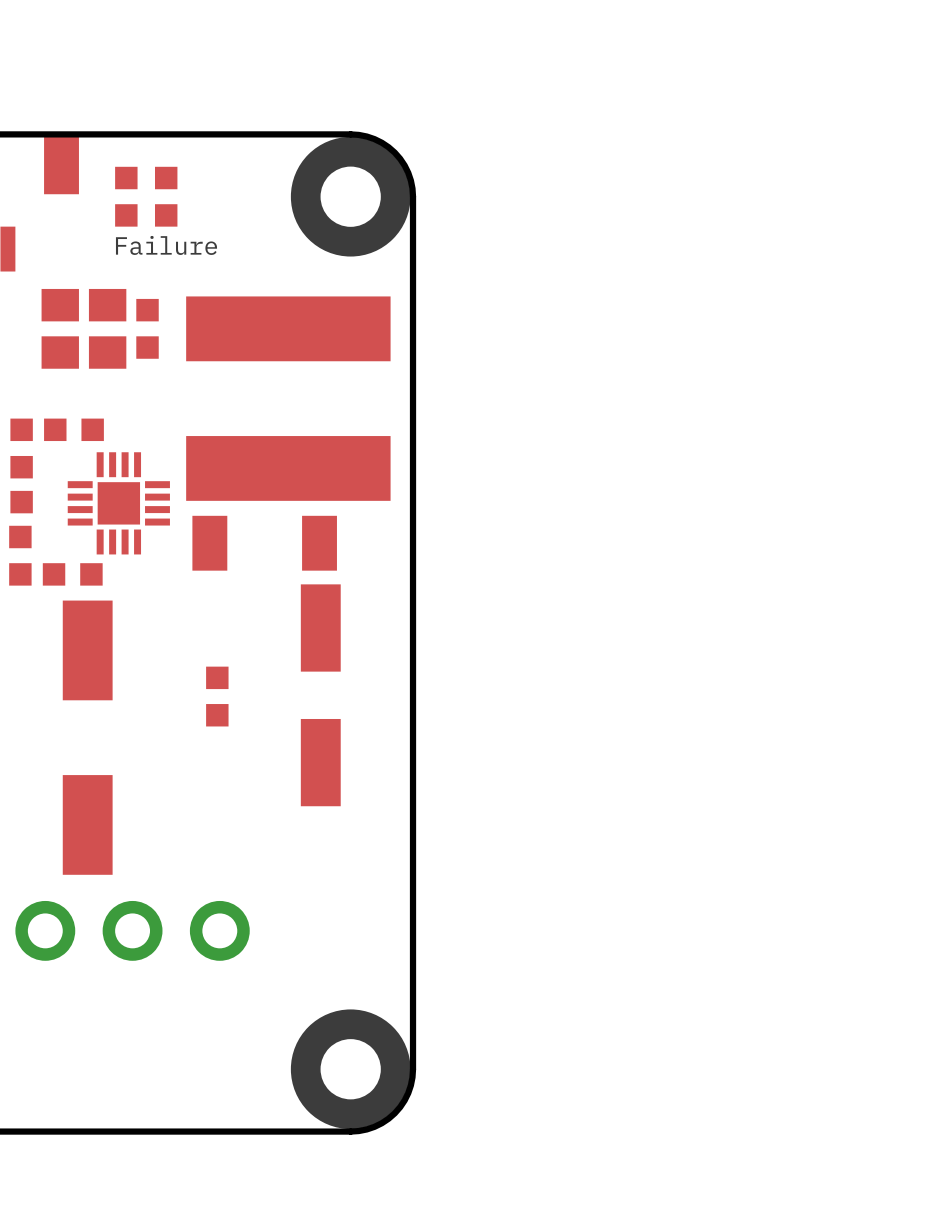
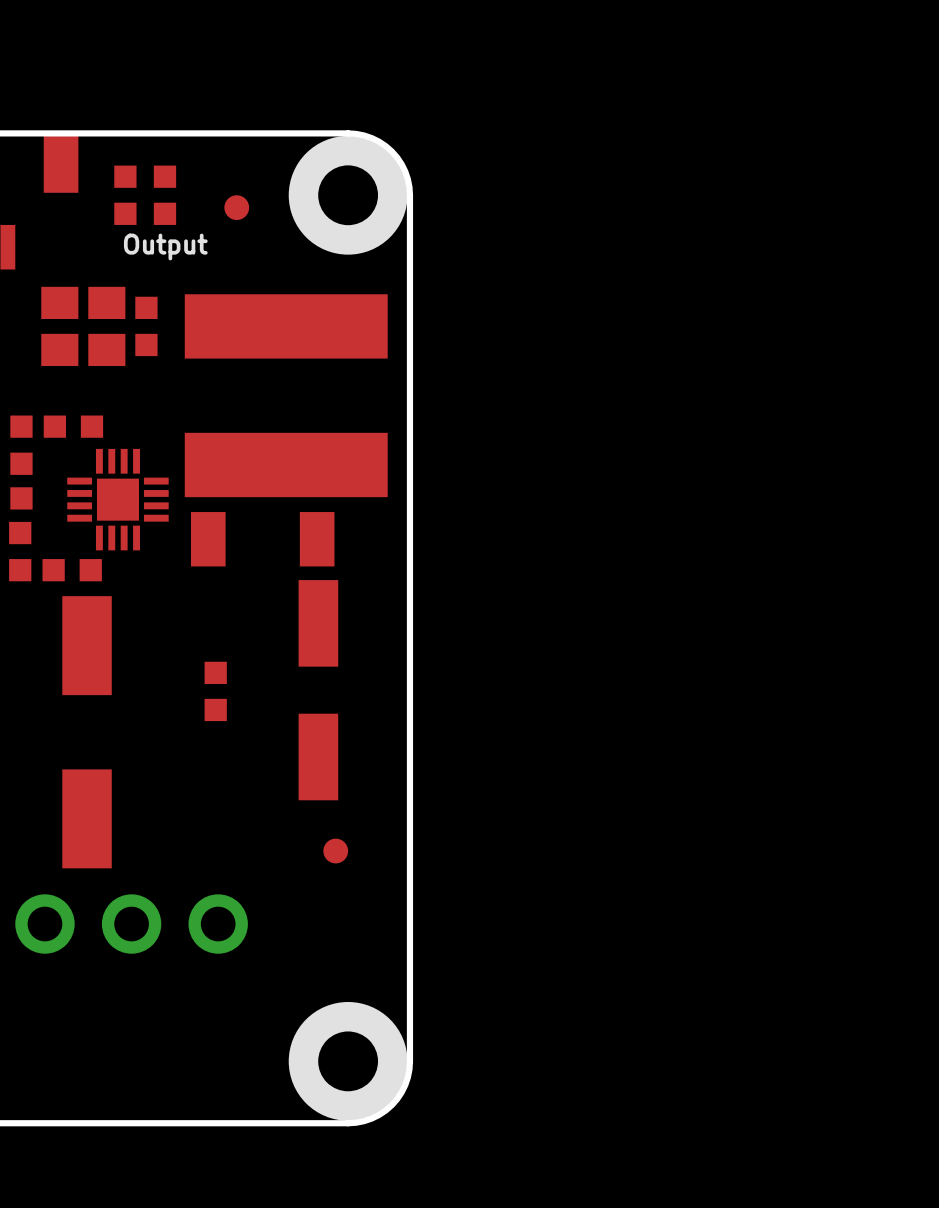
part: none -> (236, 207)
text: Failure (166, 245) -> Output (165, 247)
part: none -> (335, 851)

